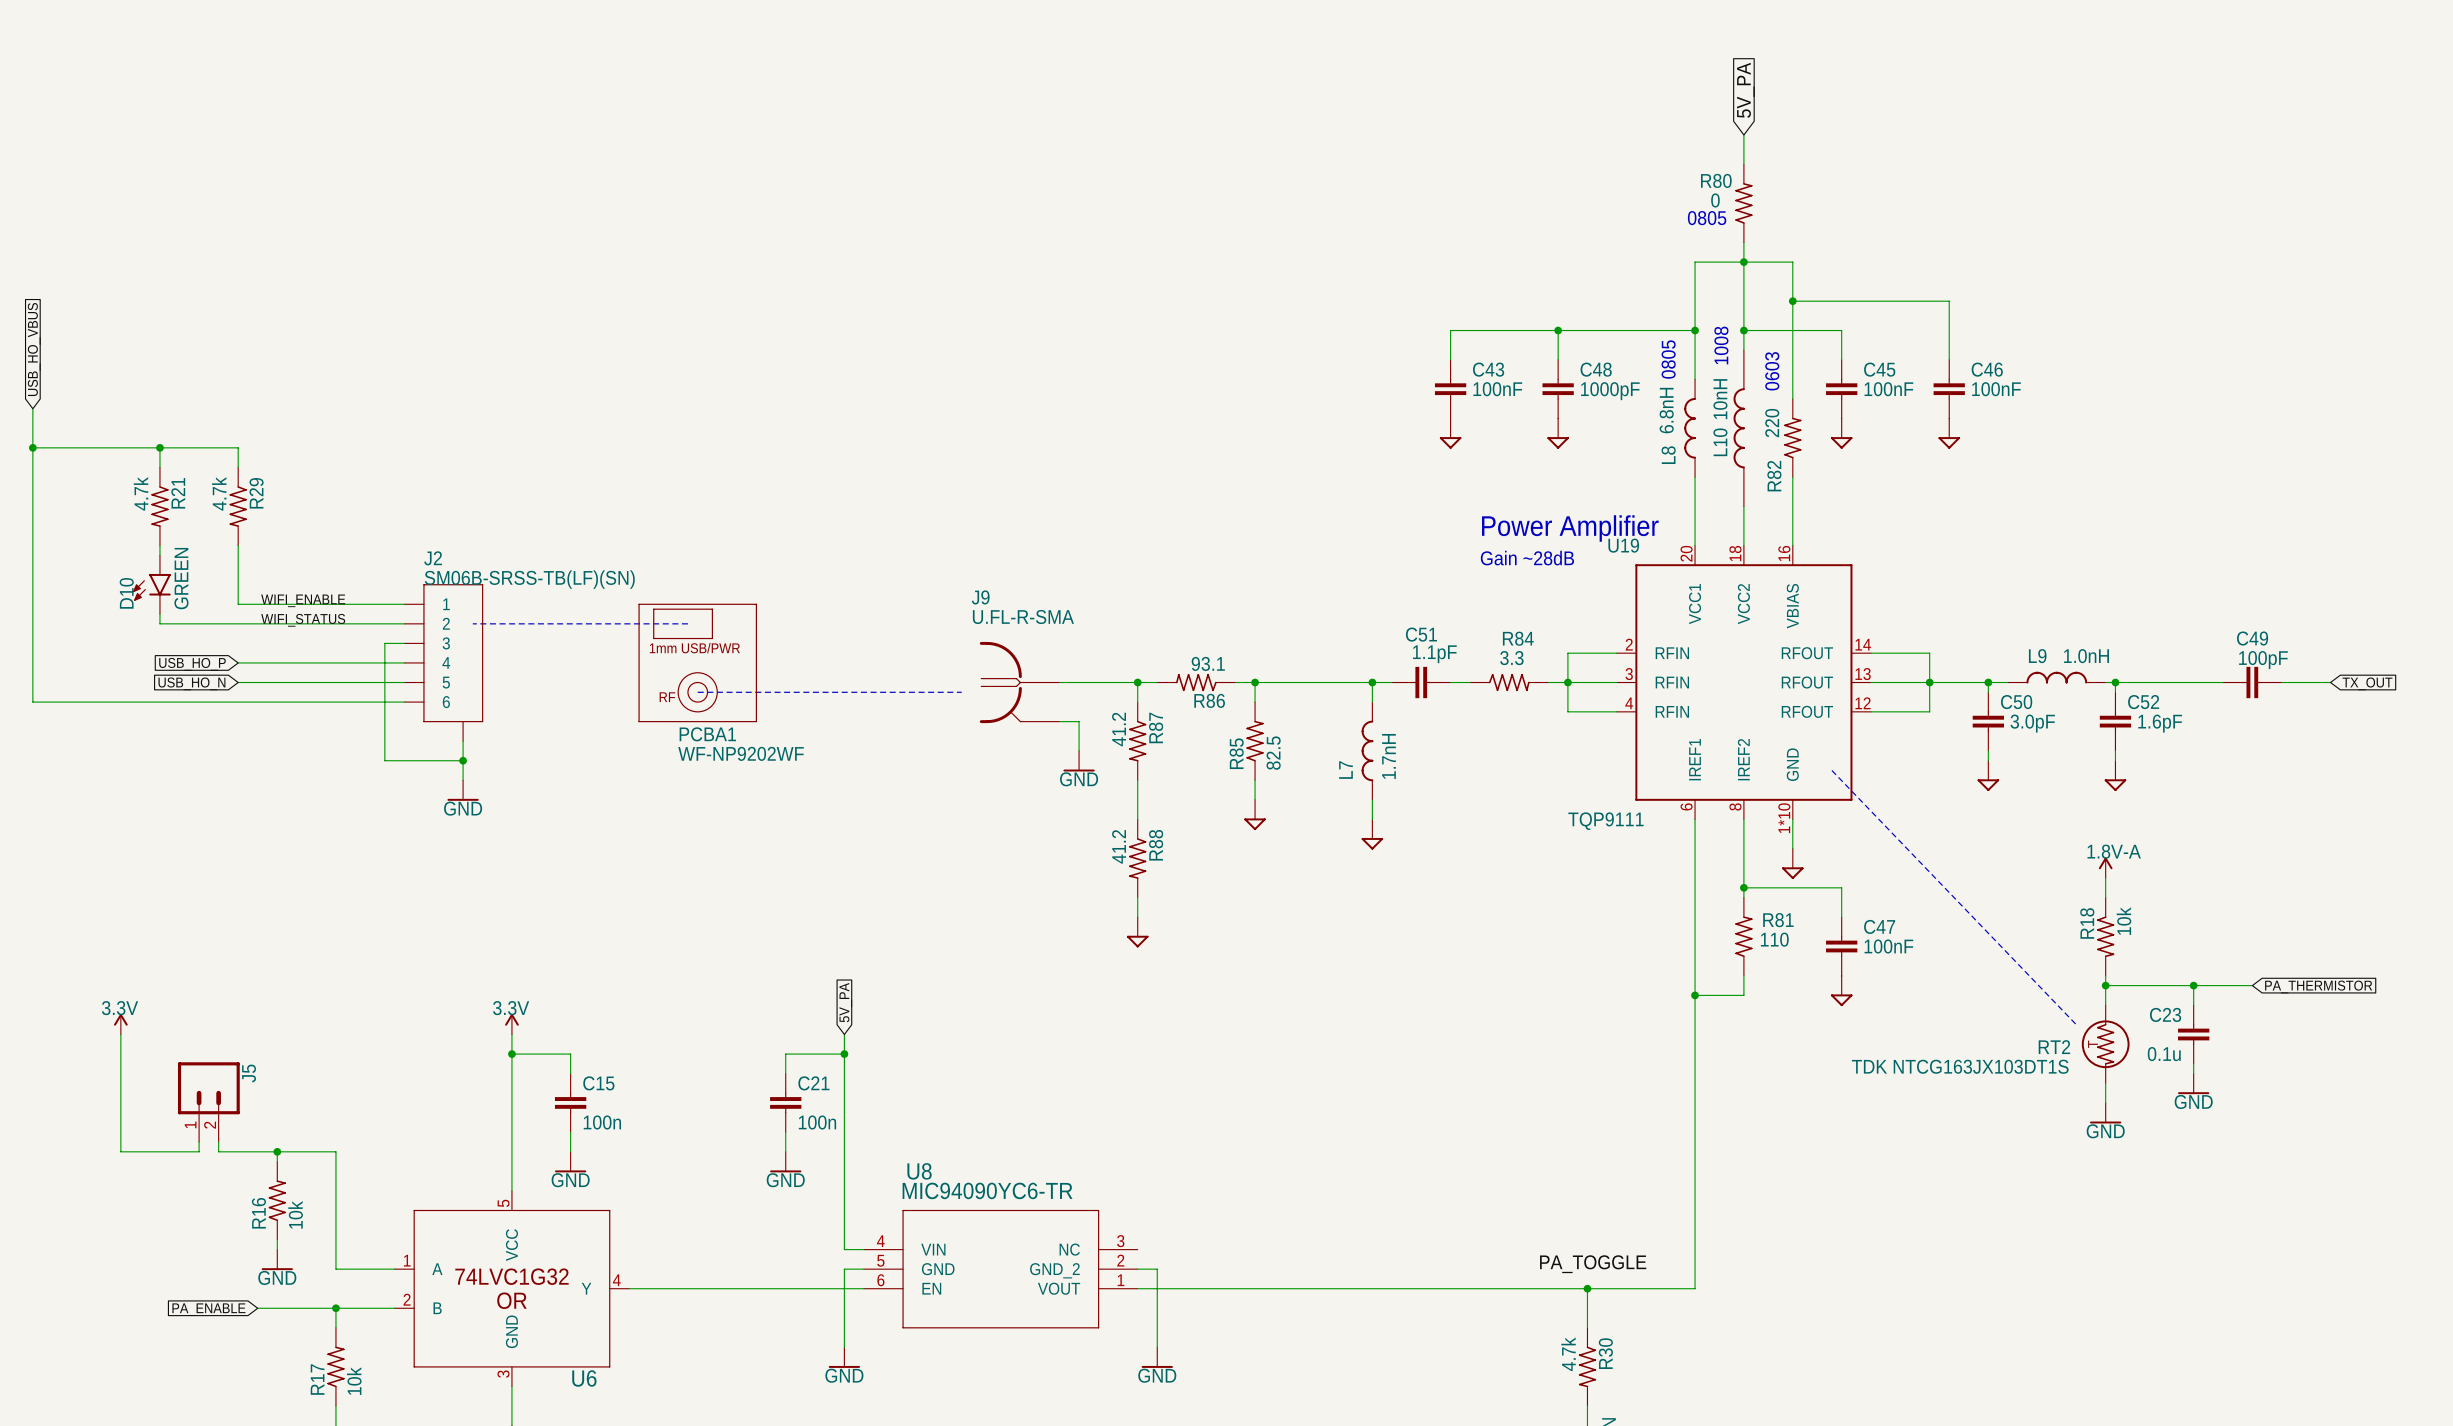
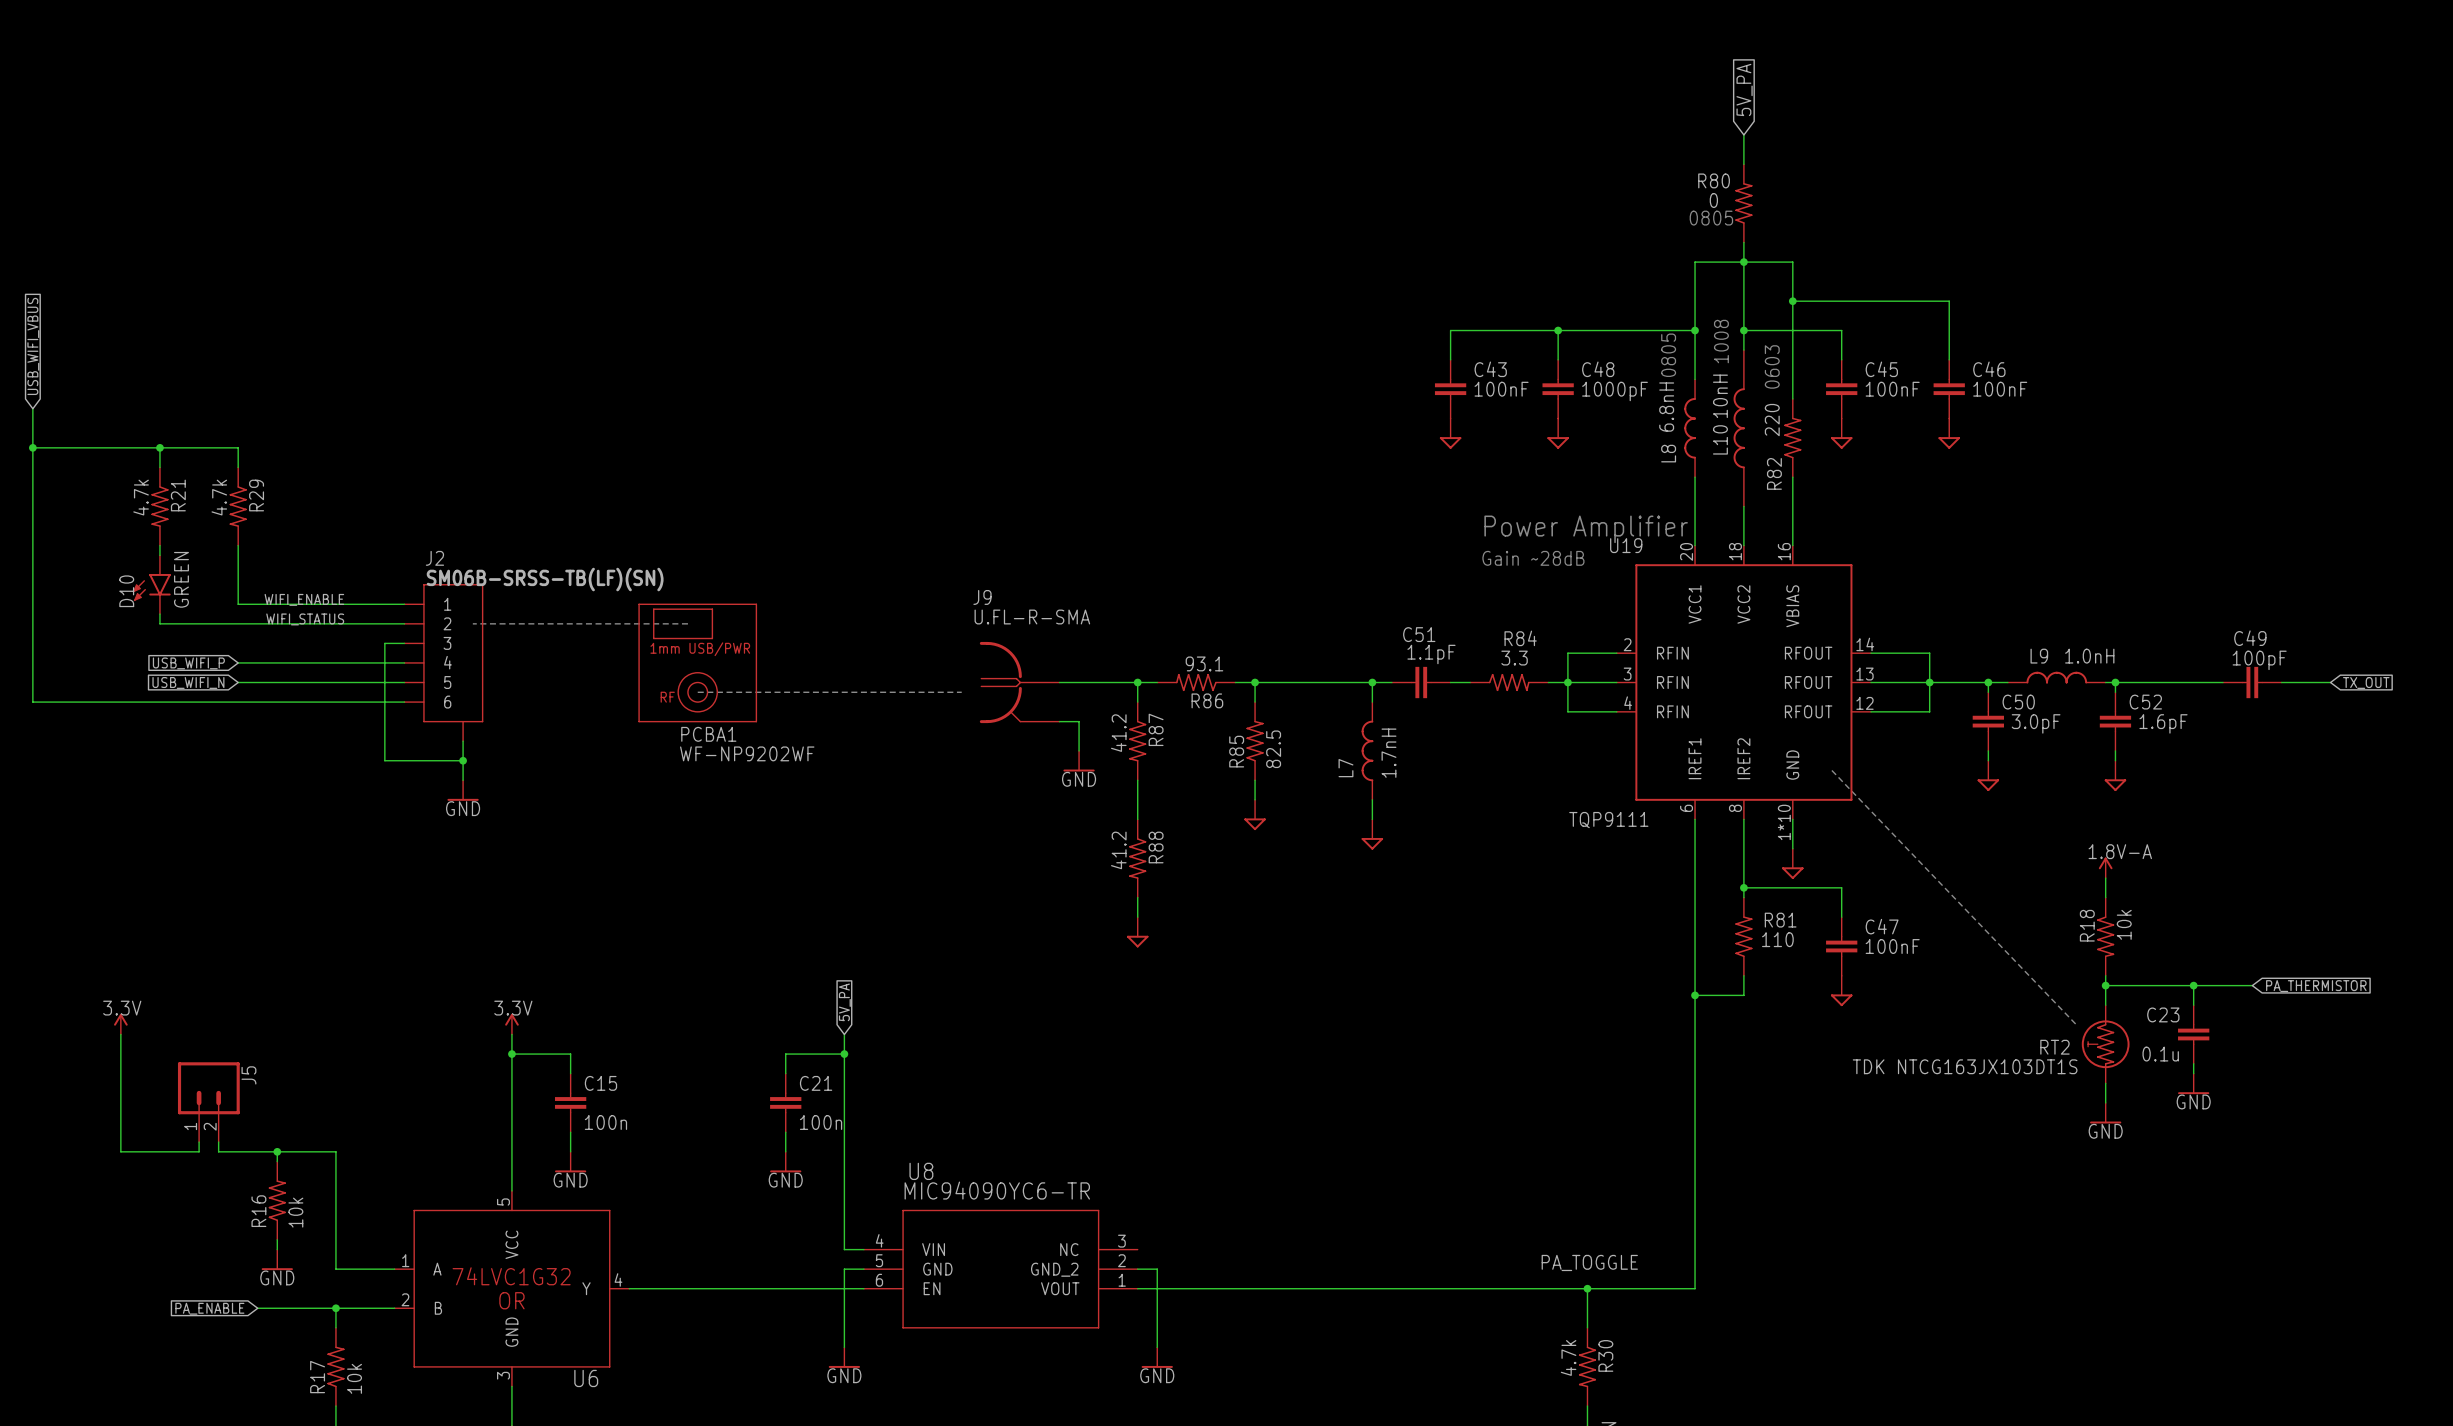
global label: USB_HO_VBUS (34, 349) -> USB_WIFI_VBUS (33, 346)
global label: USB_HO_P (192, 664) -> USB_WIFI_P (188, 663)
global label: USB_HO_N (191, 683) -> USB_WIFI_N (188, 682)

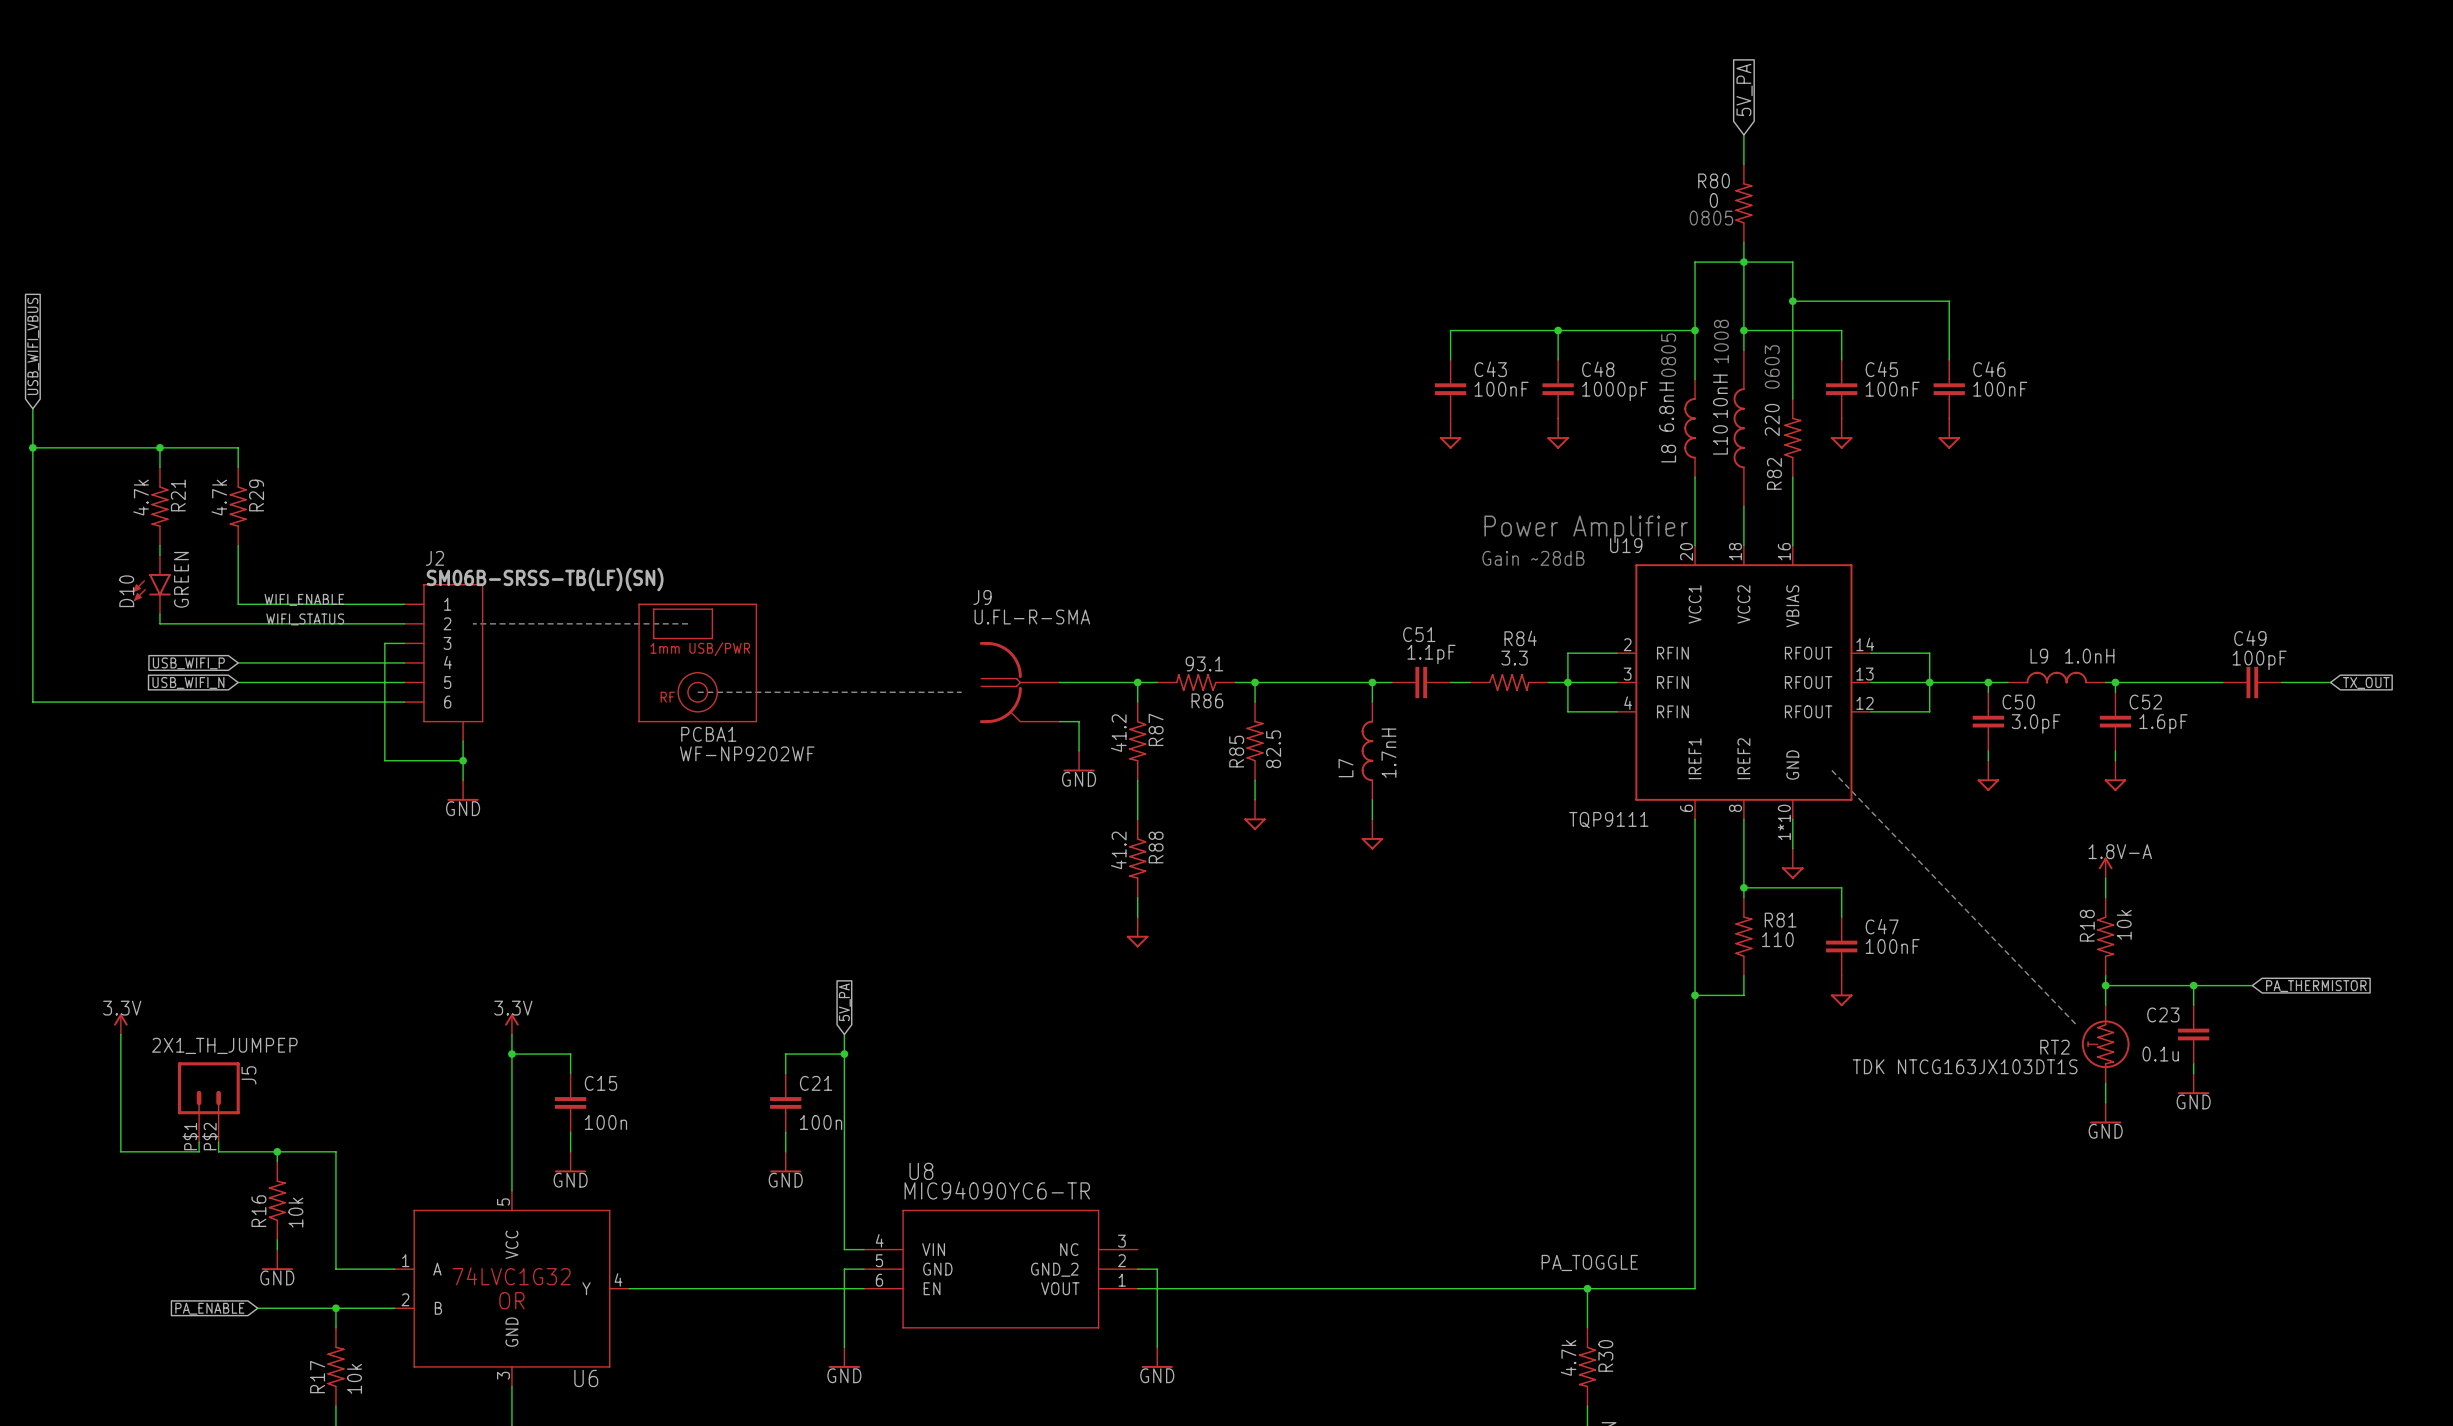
J5 value: none -> 2X1_TH_JUMPEP (224, 1045)
J5 pin number: 1 (190, 1126) -> P$1 (190, 1136)
J5 pin number: 2 (210, 1126) -> P$2 (210, 1136)

